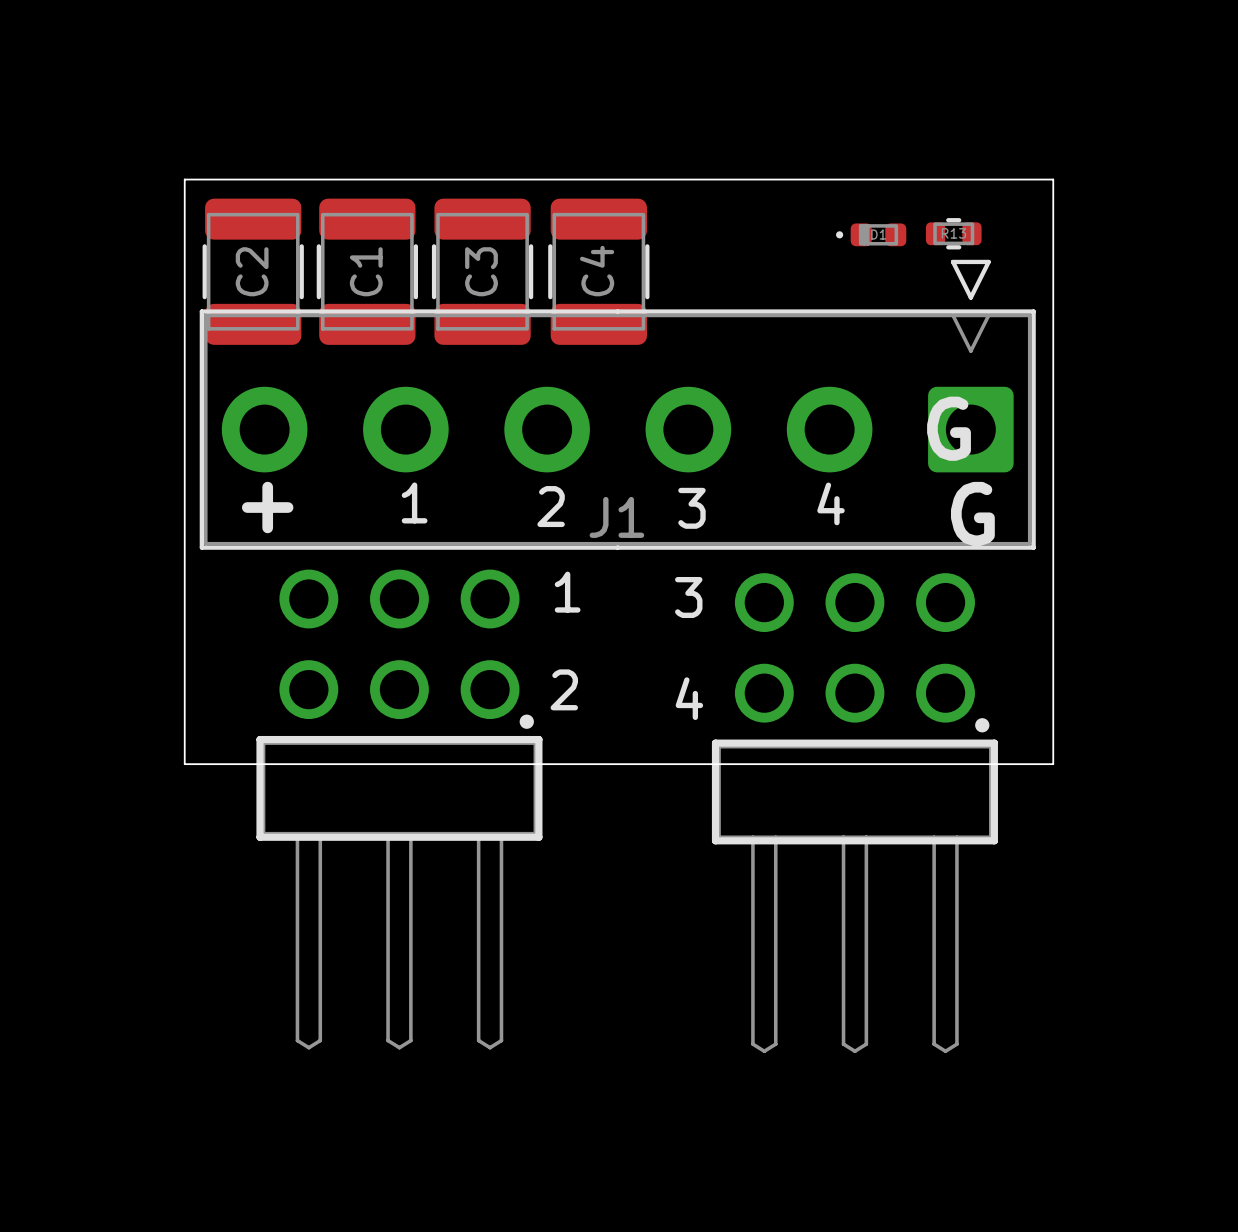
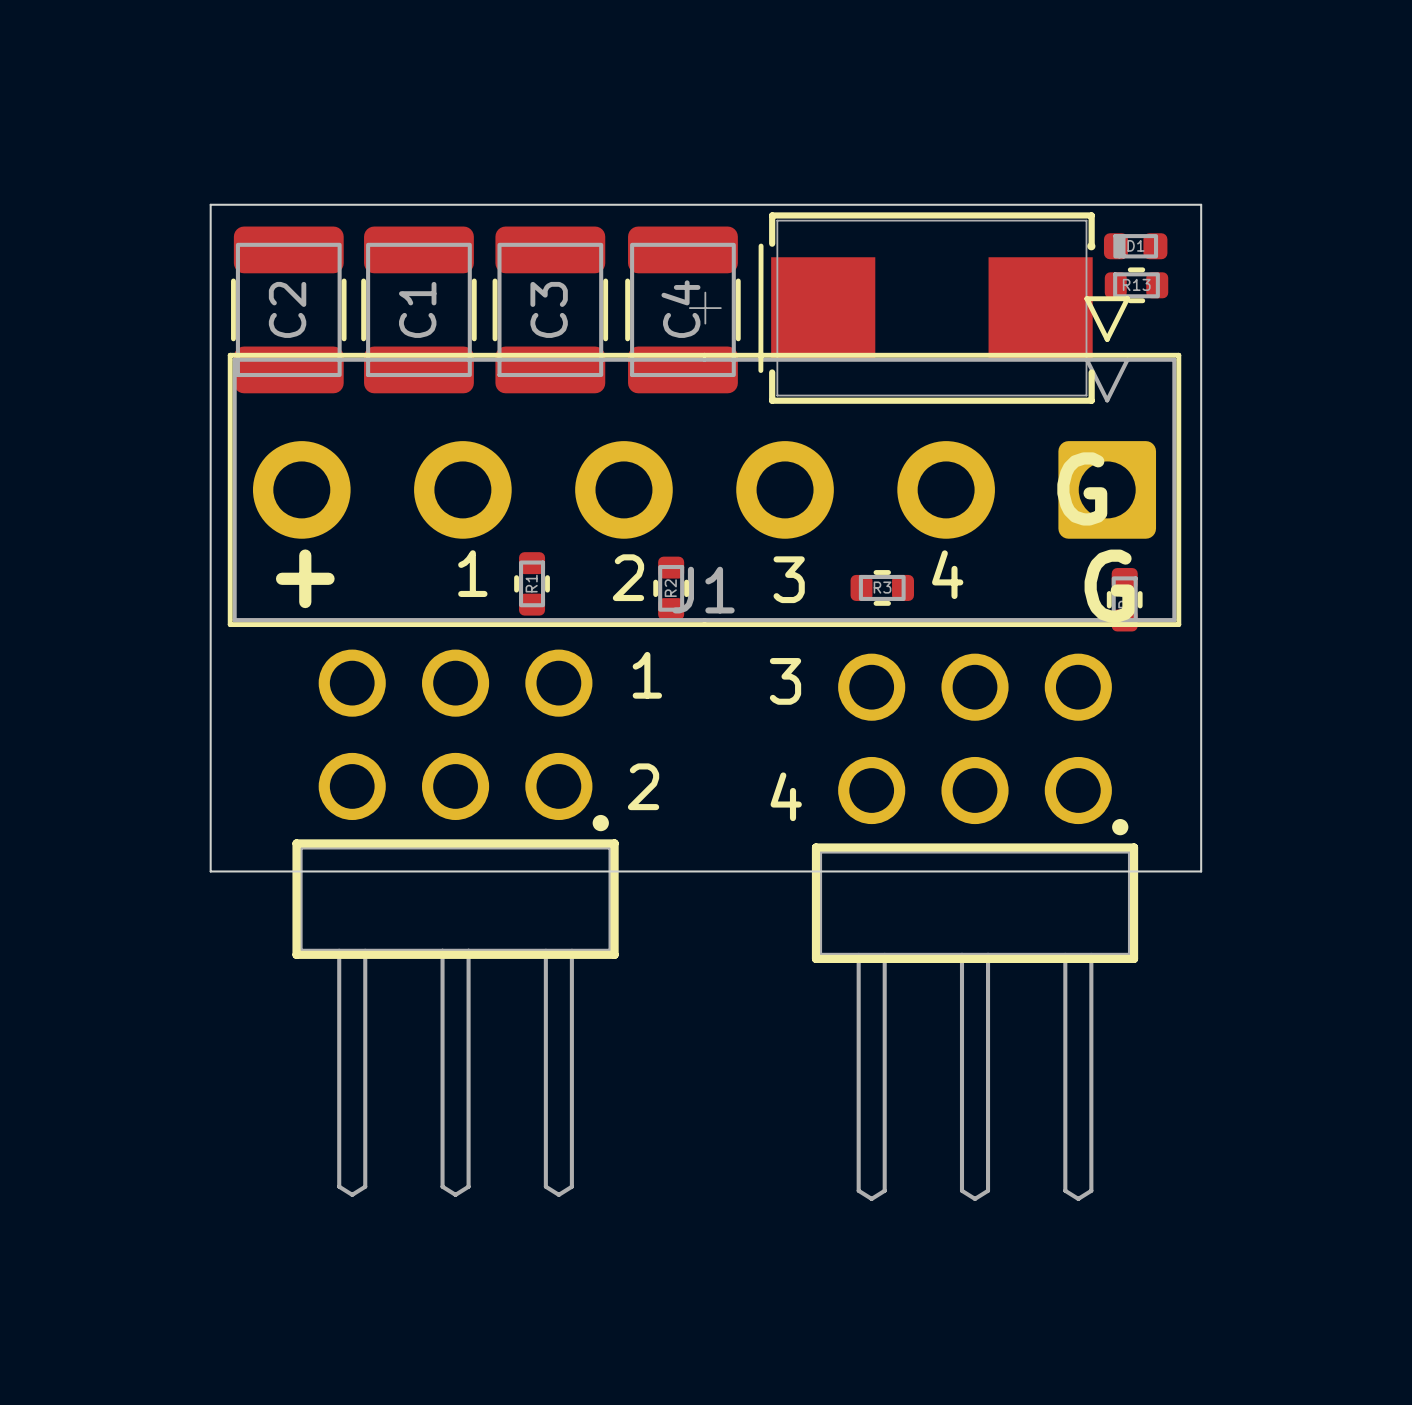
R13 position: (953, 233) -> (1136, 285)
D1 position: (871, 234) -> (1127, 246)
part: none -> (892, 308)
R1: none -> (532, 583)
R2: none -> (671, 588)
R3: none -> (882, 587)
part: none -> (1124, 599)

